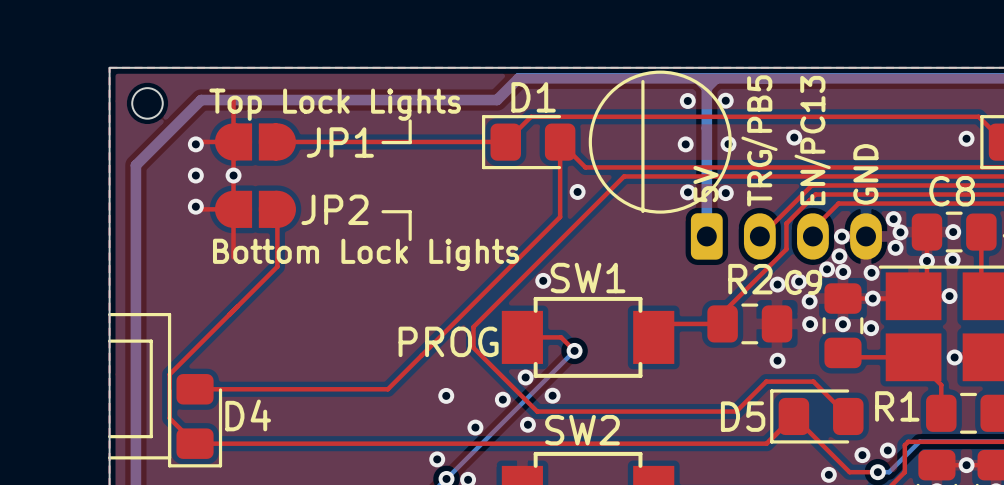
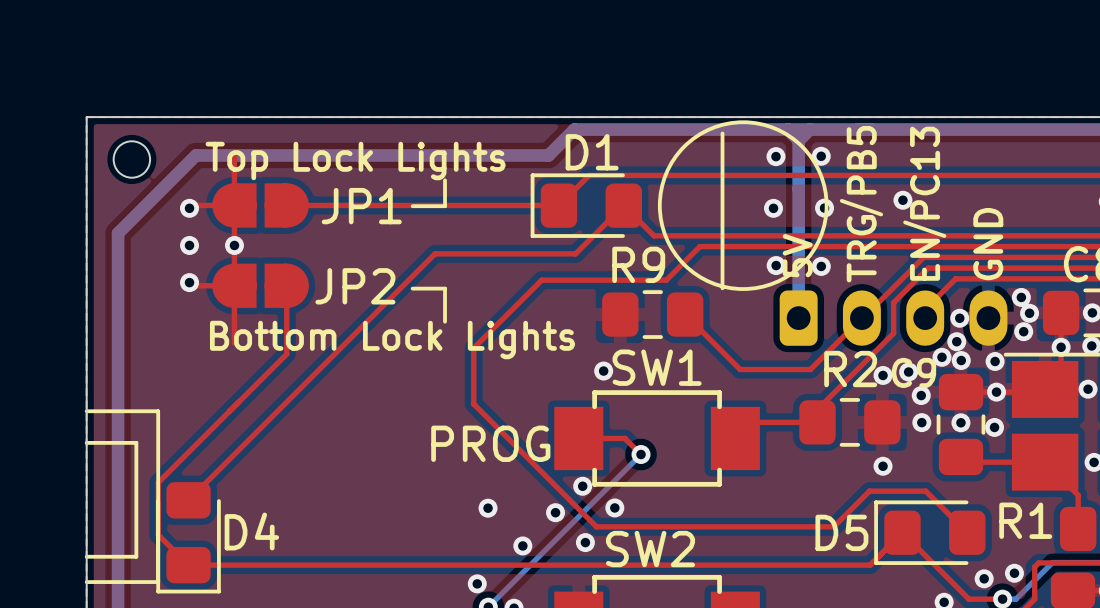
top track: (560, 142) (560, 217) (387, 389) (195, 389) -> (623, 205) (575, 253) (434, 253) (188, 500)
via: (577, 191) -> none
top track: (595, 204) (473, 327) (473, 347) -> (666, 280) (541, 280) (473, 348) (473, 404) (520, 450)
R9: none -> (652, 314)
top track: none -> (685, 314) (740, 369) (810, 369) (861, 318)

